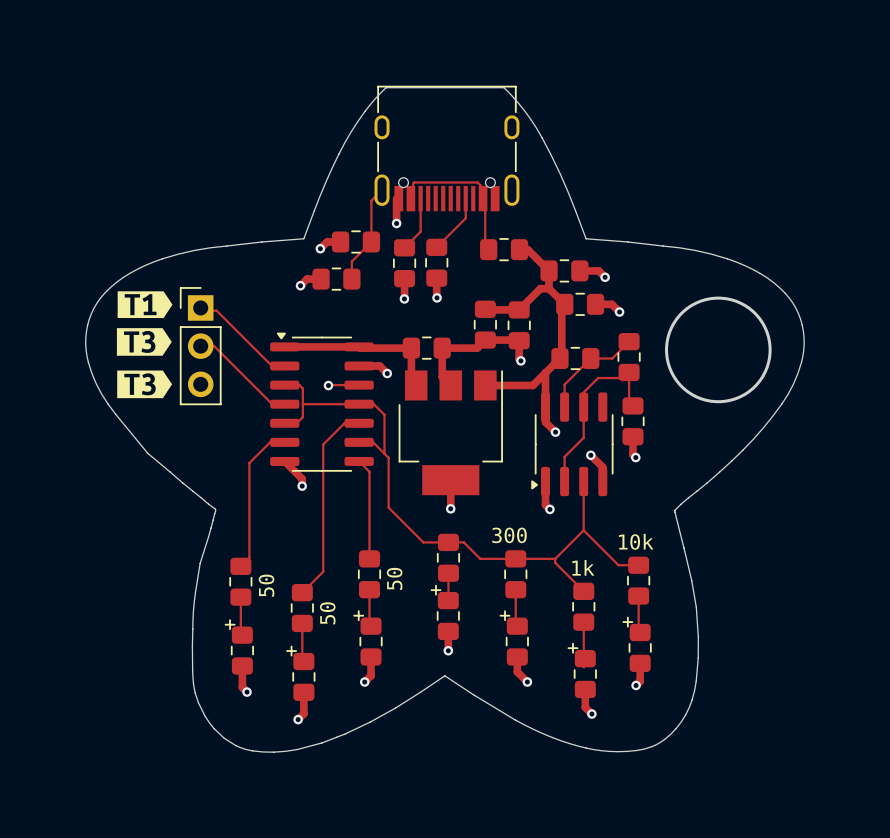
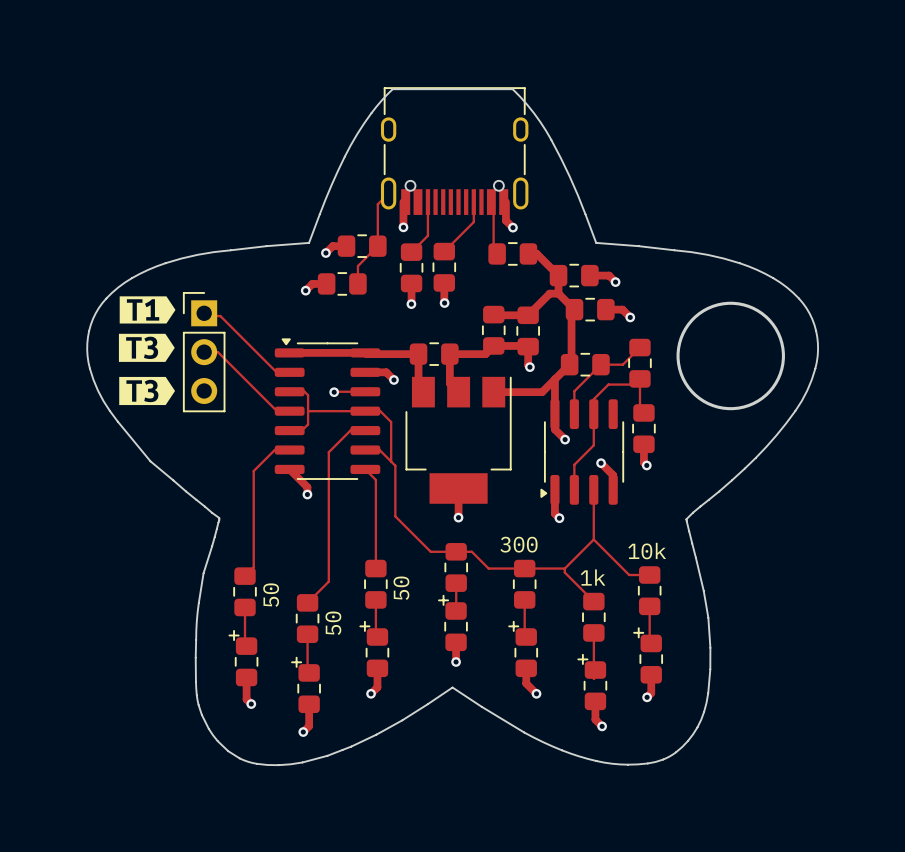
track: (413, 198) (414, 182) (477, 182) (480, 185) (480, 198) -> none
track: none -> (505, 202) (505, 220) (512, 227)
via: none -> (512, 227)

